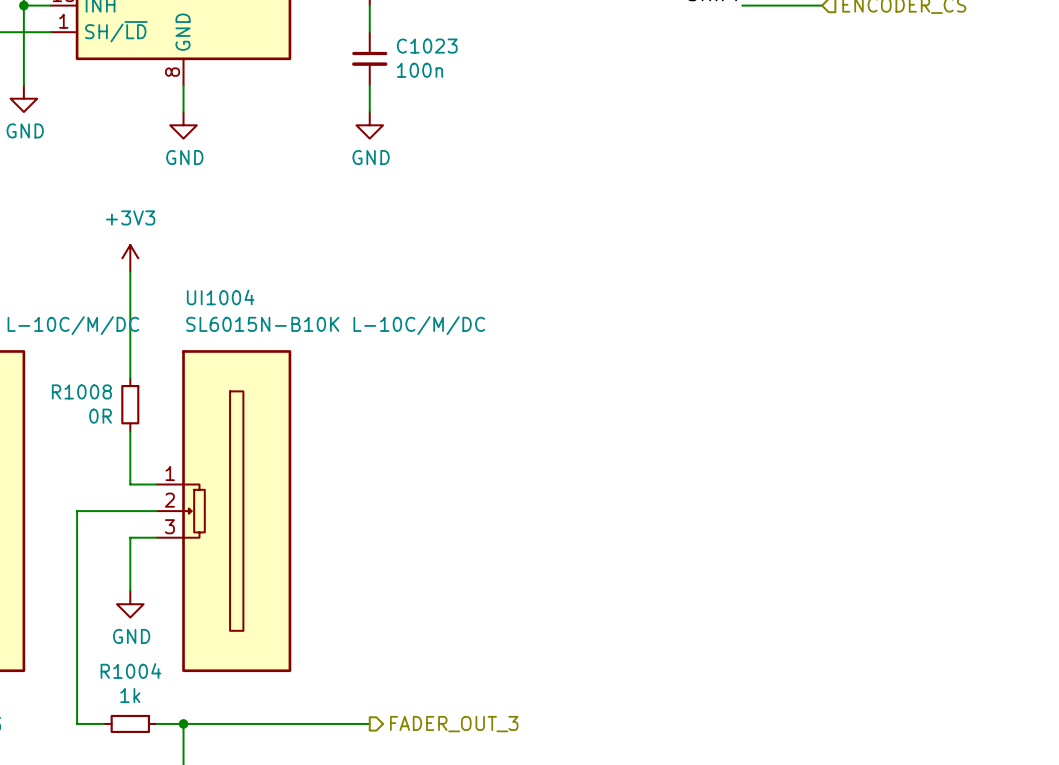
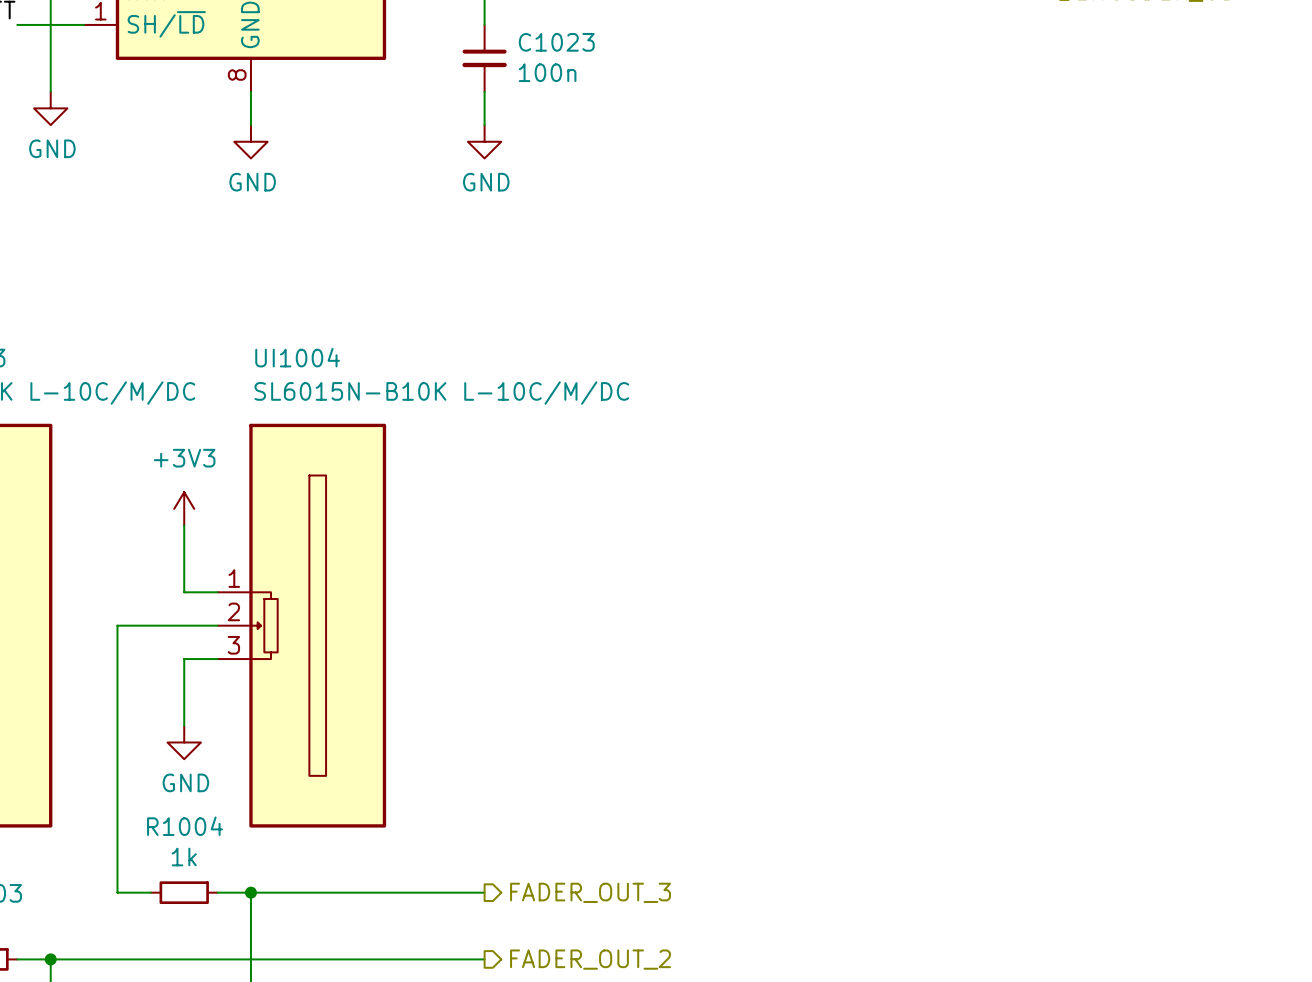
power symbol: +3V3 (130, 258) -> none
wire: (130, 271) (130, 378) -> none
R1008: 0R (130, 404) -> none
power symbol: none -> +3V3 (184, 508)

